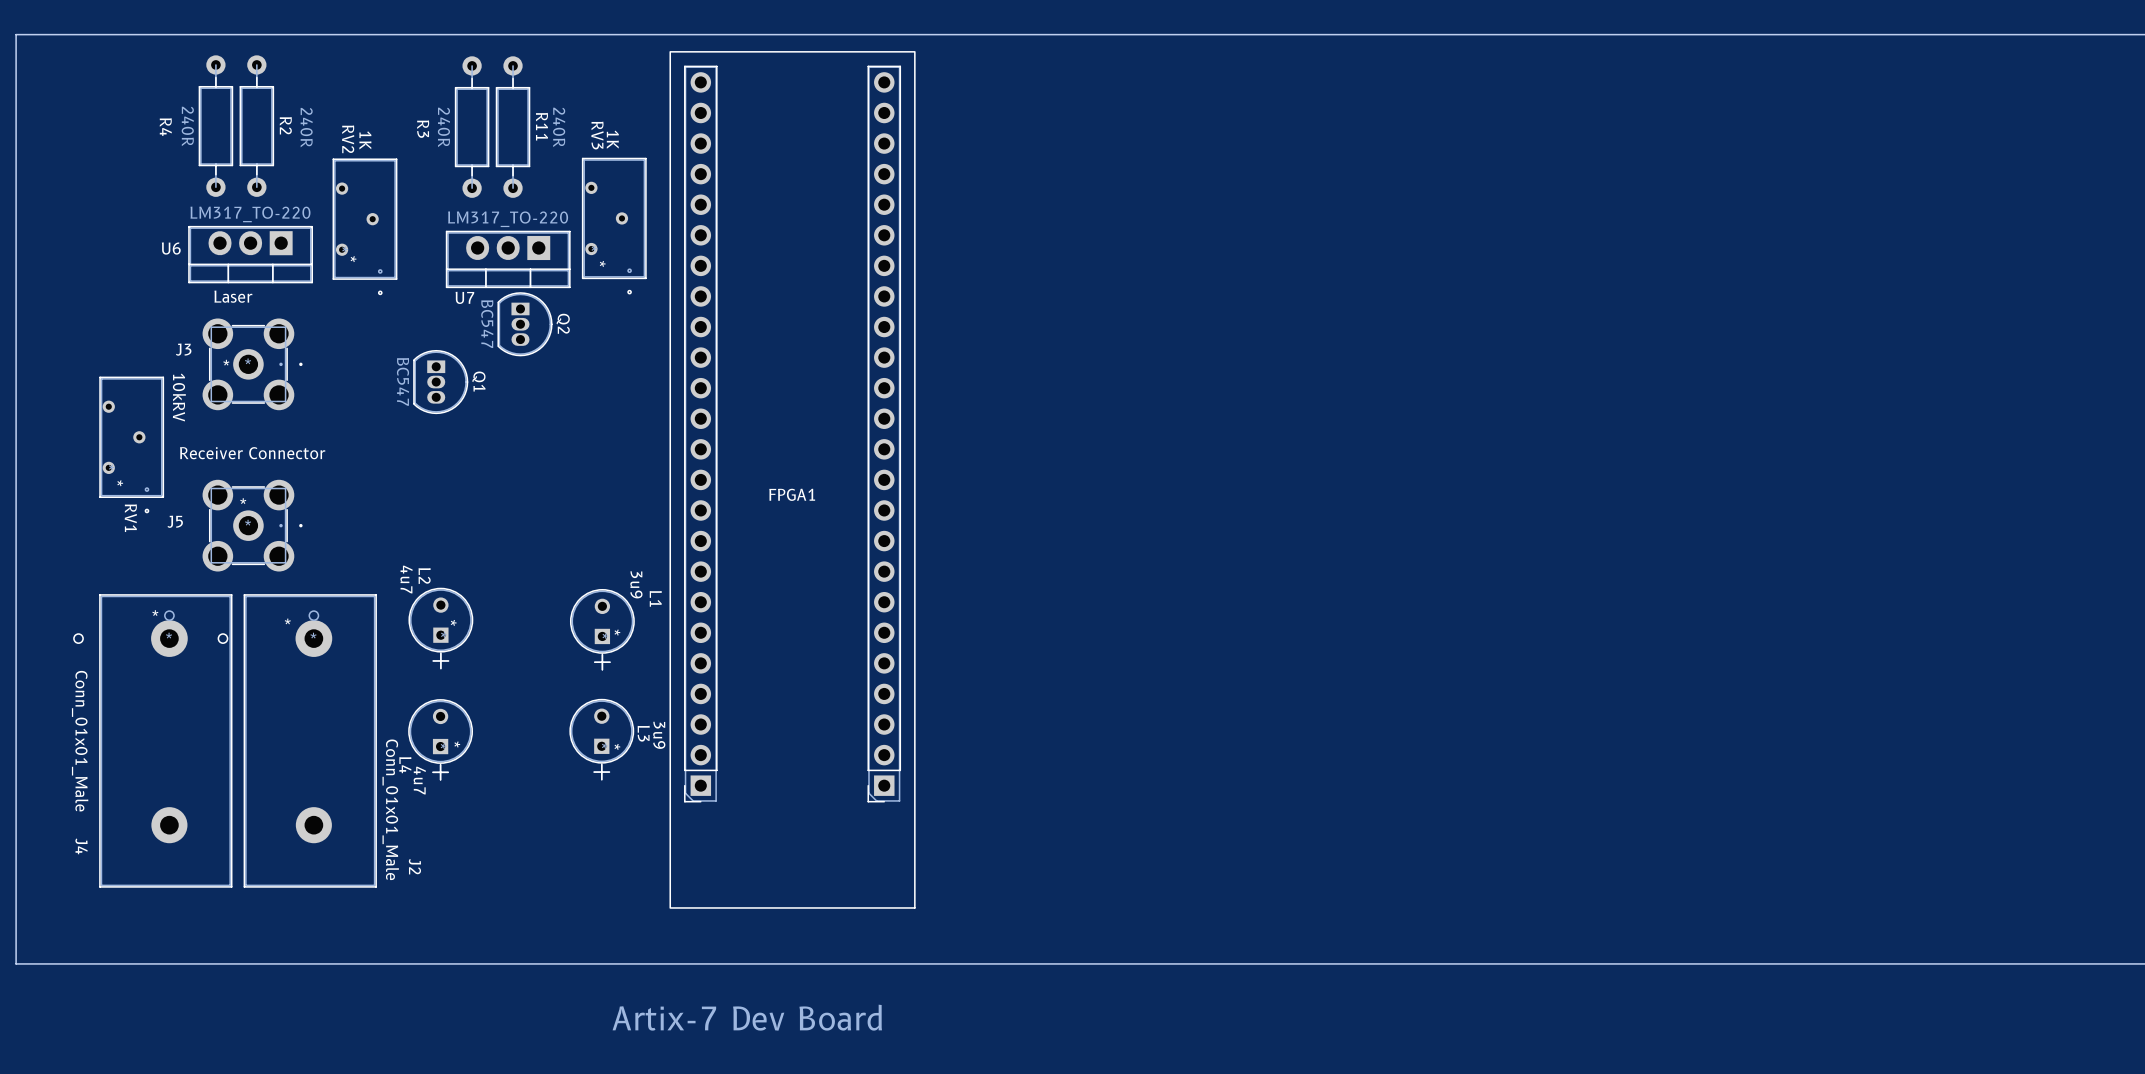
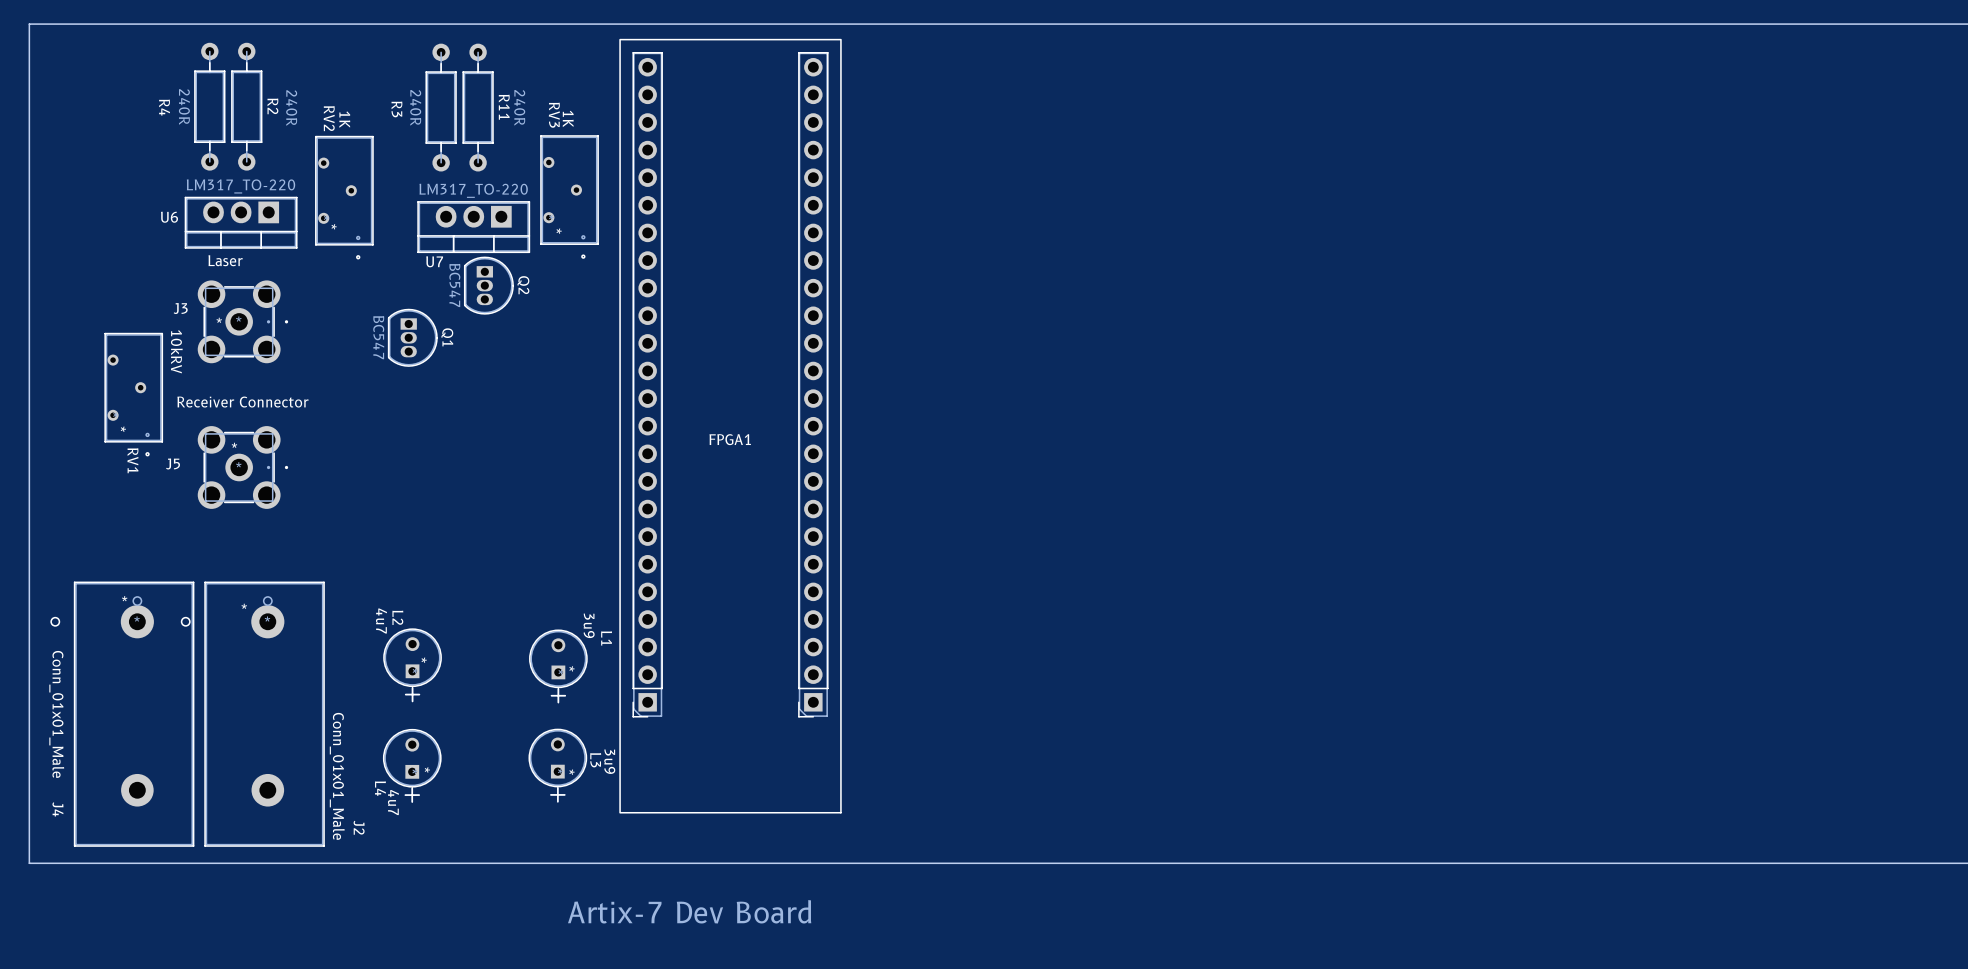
L2 position: (440, 628) -> (412, 665)
L1 position: (602, 629) -> (558, 666)
L4 position: (440, 739) -> (412, 765)
L3 position: (601, 739) -> (557, 765)
J4 position: (152, 740) -> (122, 714)
J2 position: (297, 740) -> (252, 714)

